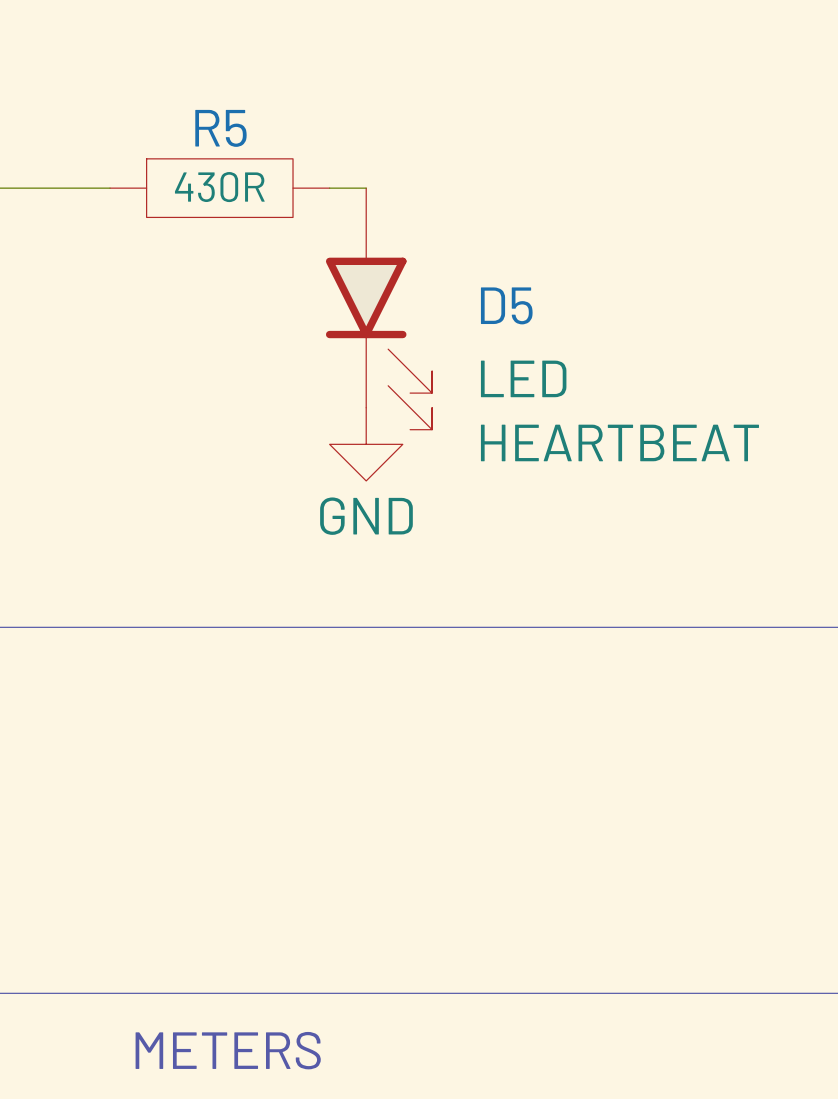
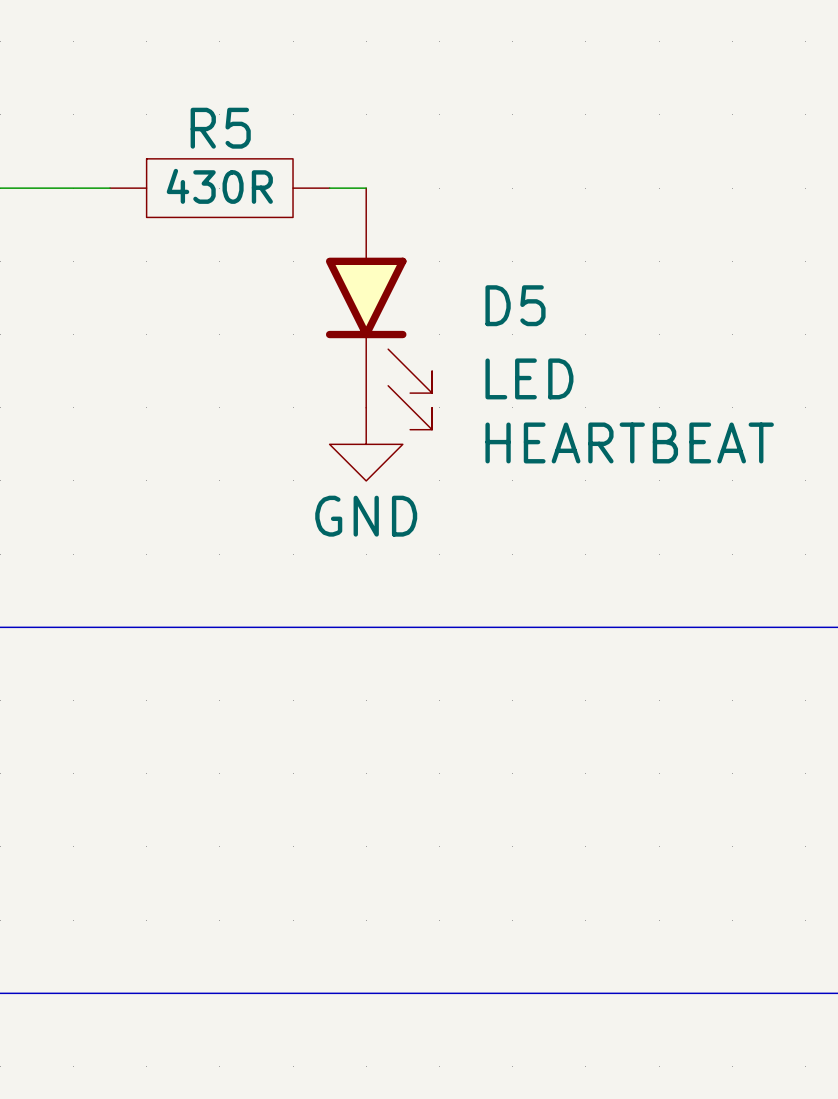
text: METERS (228, 1050) -> none

